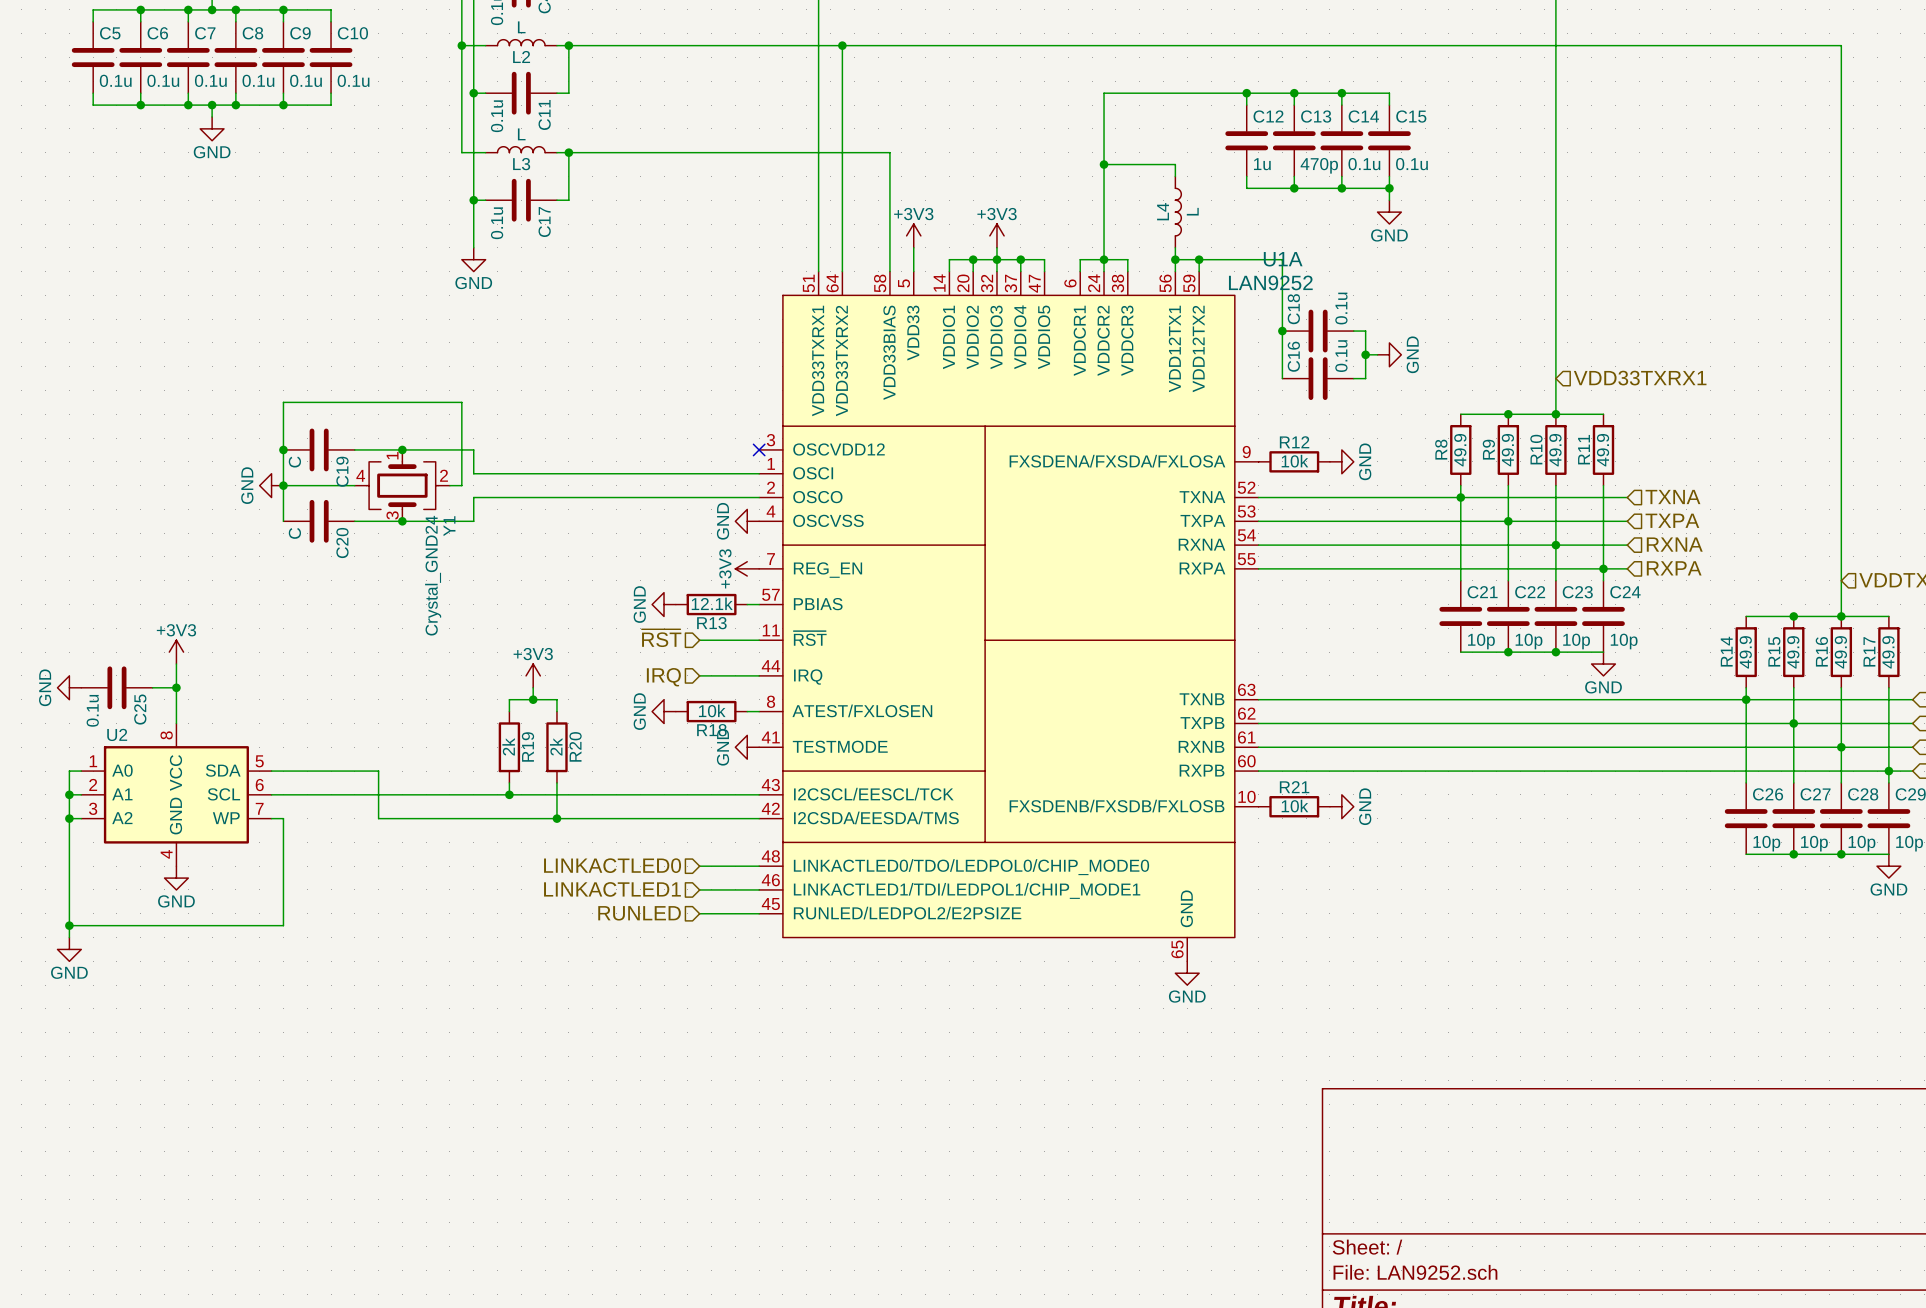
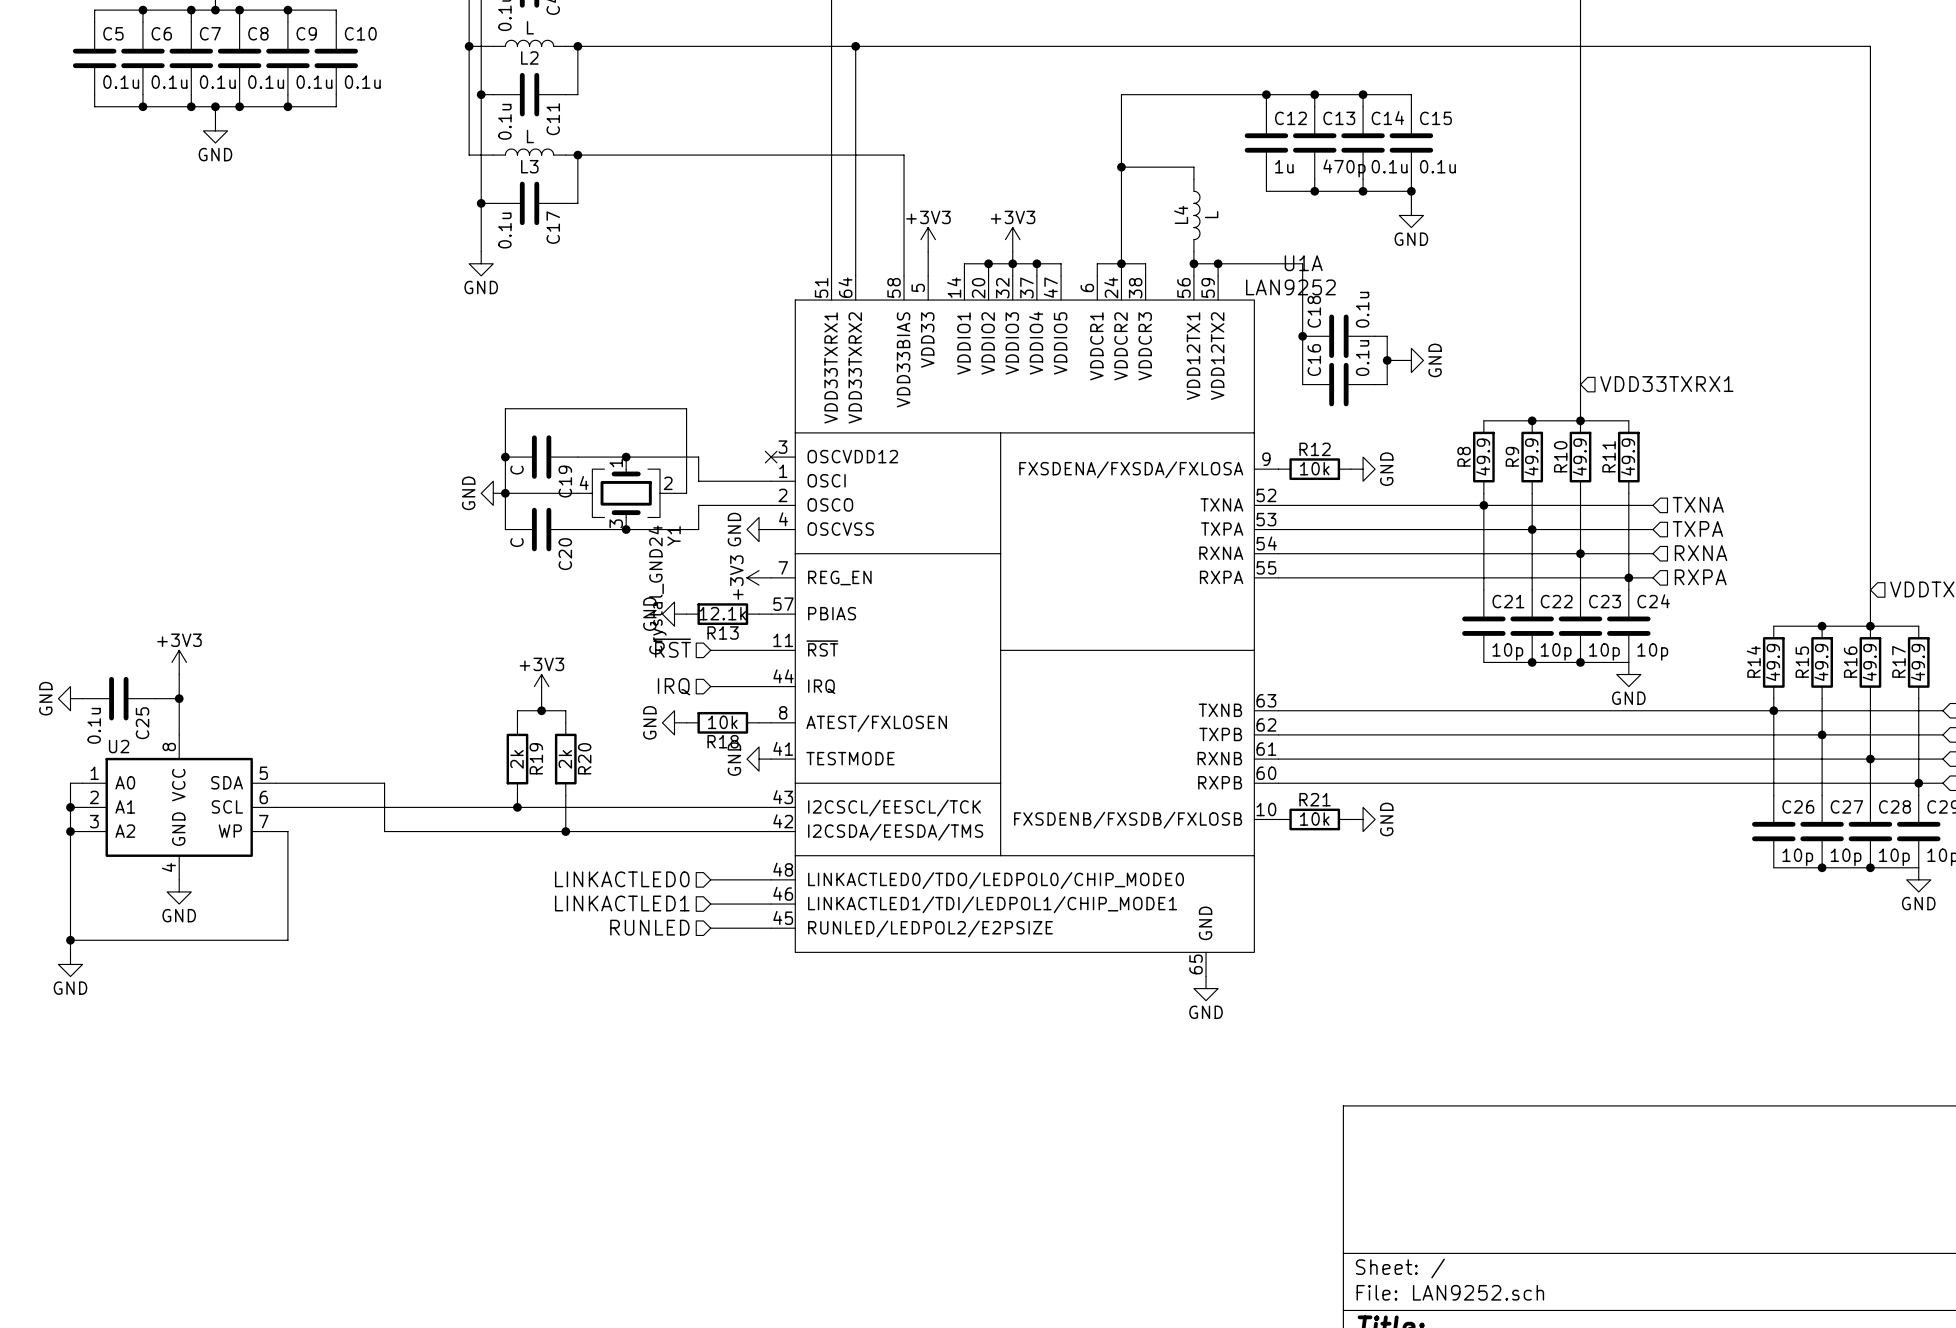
junction: (283, 449) -> none
C19 position: (319, 449) -> (541, 457)
wire: (354, 449) (473, 449) (473, 473) (687, 473) -> (577, 457) (698, 457) (698, 481)
junction: (402, 449) -> none
junction: none -> (505, 457)
junction: none -> (626, 457)
power symbol position: GND (271, 485) -> GND (493, 493)
wire: (283, 485) (354, 485) -> (505, 493) (577, 493)
junction: (283, 485) -> none
Y1 position: (402, 485) -> (626, 493)
wire: (449, 485) (461, 485) (461, 402) (283, 402) (283, 521) -> (674, 493) (686, 493) (686, 408) (505, 408) (505, 529)
junction: none -> (505, 493)
wire: (687, 497) (473, 497) (473, 521) (354, 521) -> (698, 505) (698, 529) (577, 529)
C20 position: (319, 521) -> (541, 529)
junction: (402, 521) -> none
junction: none -> (626, 529)

